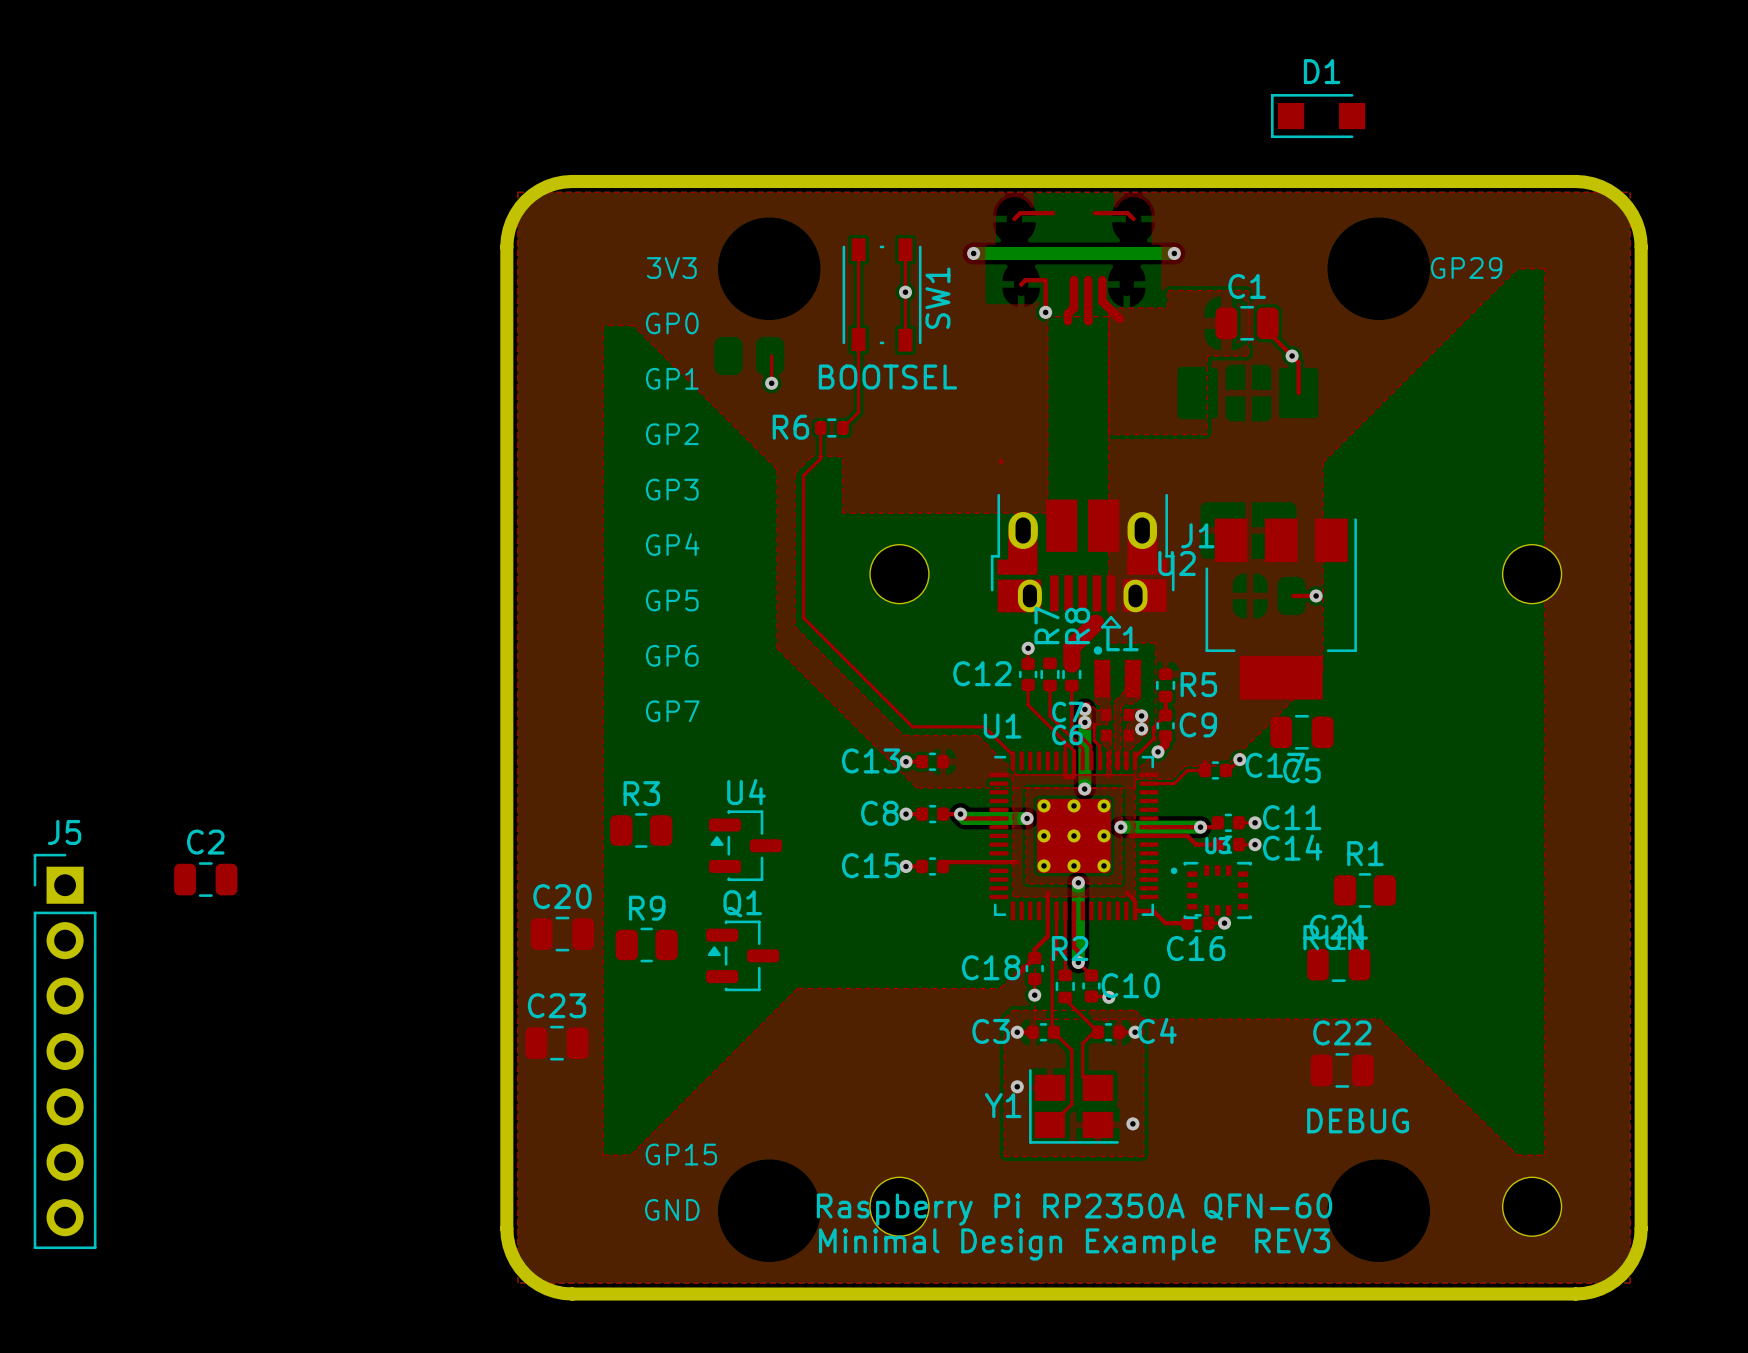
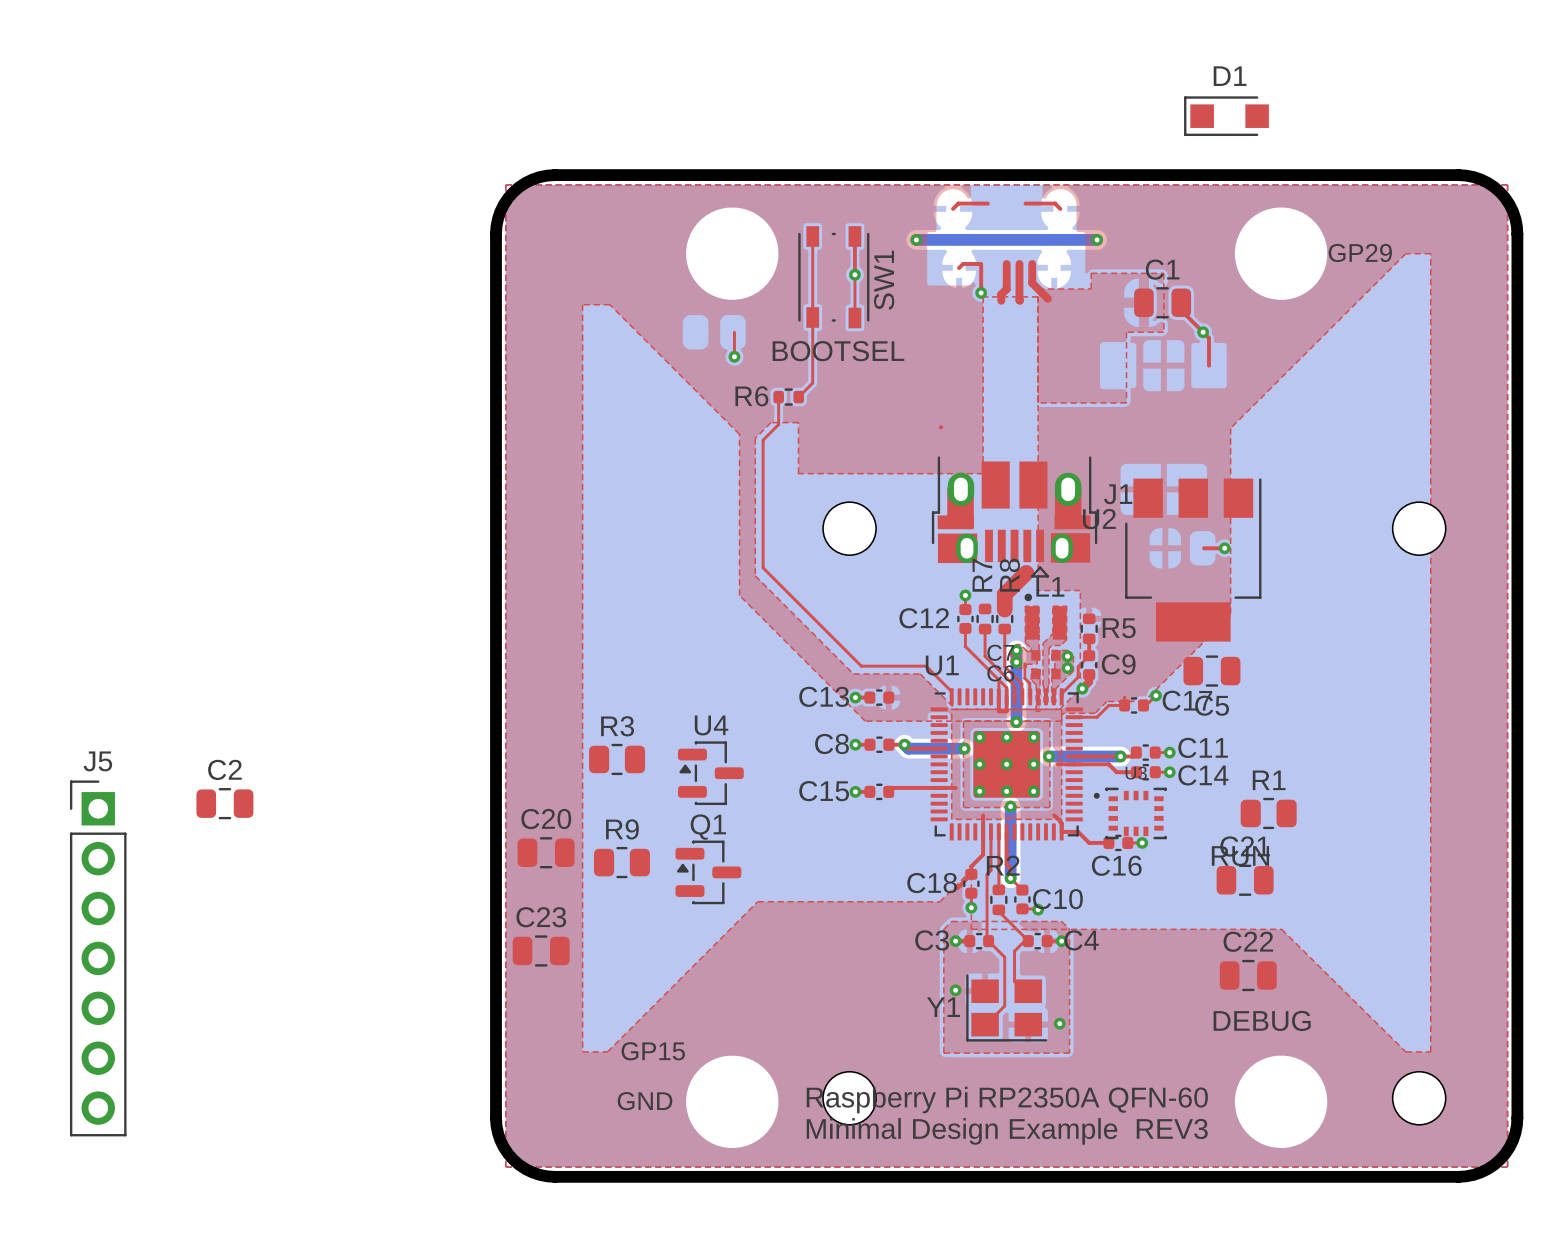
text: 3V3 (671, 268) -> none
text: GP0 (672, 323) -> none
text: GP1 (672, 378) -> none
text: GP2 (672, 434) -> none
text: GP3 (672, 489) -> none
text: GP4 (672, 544) -> none
text: GP5 (672, 600) -> none
text: GP6 (672, 655) -> none
text: GP7 (672, 711) -> none

